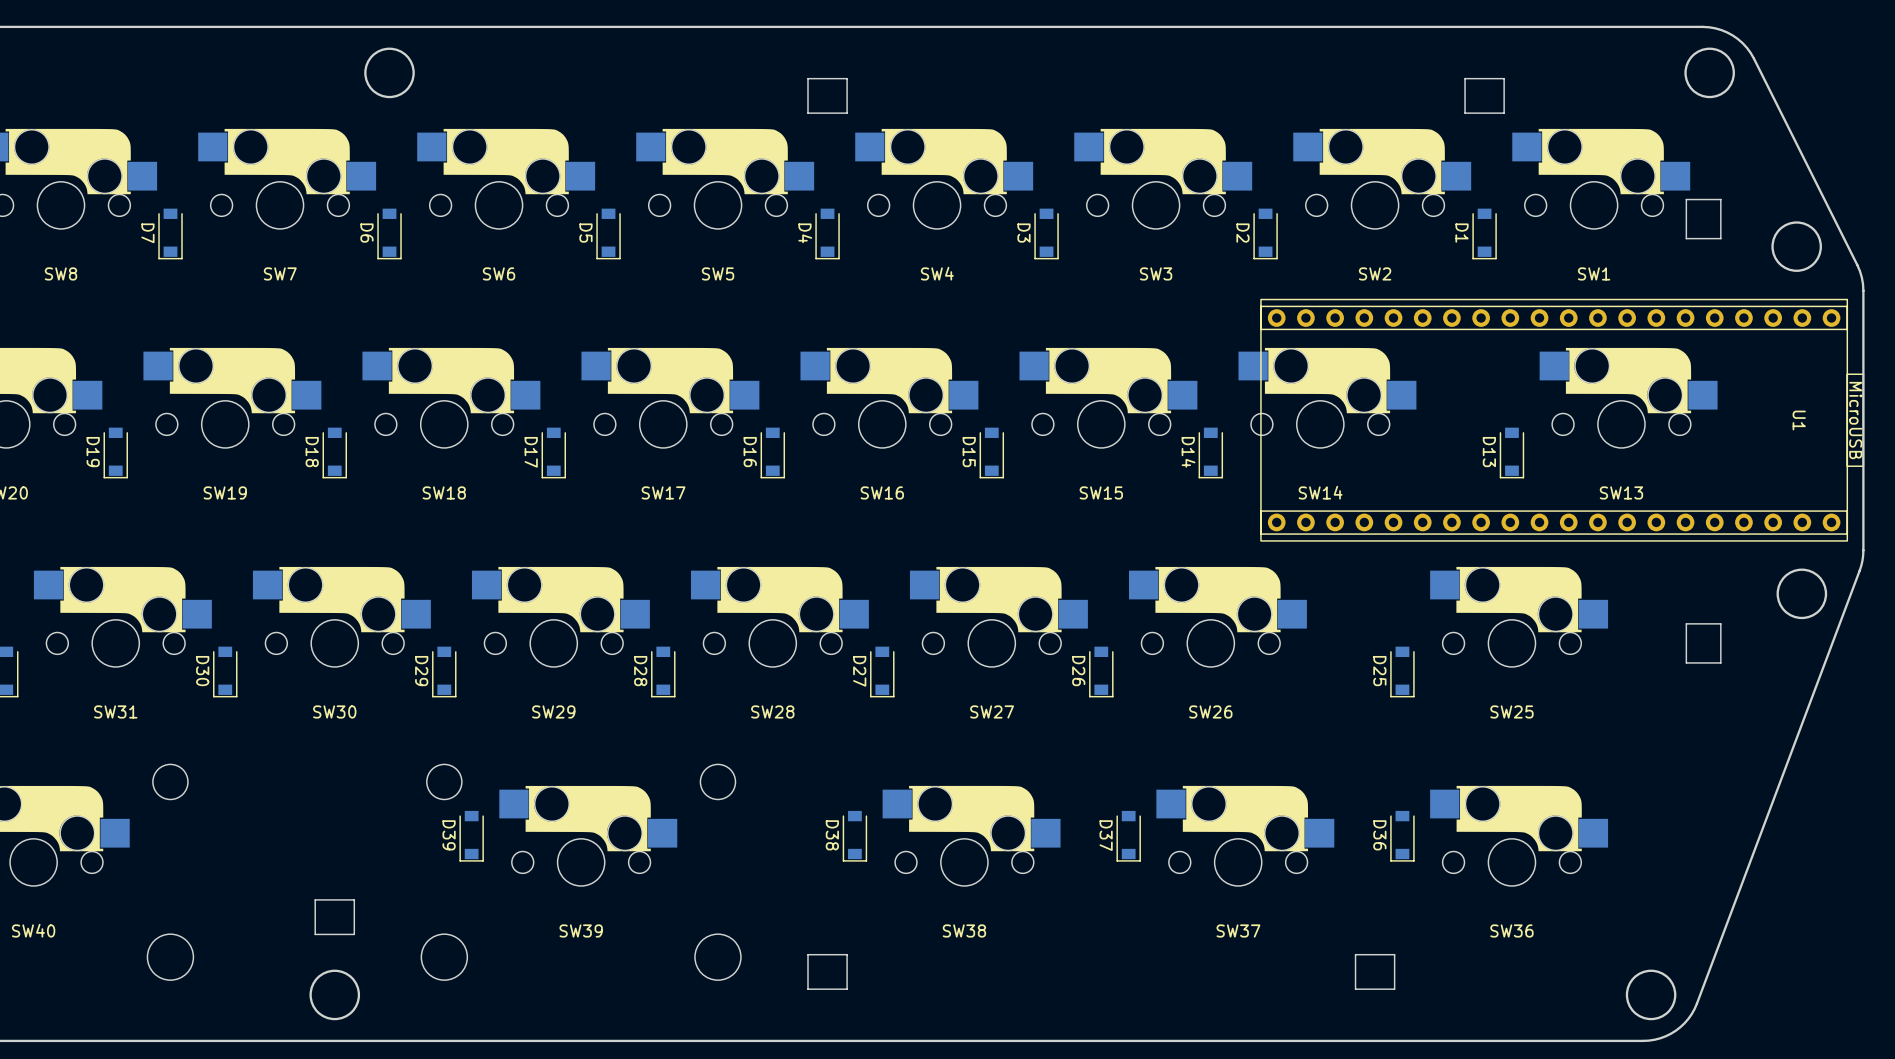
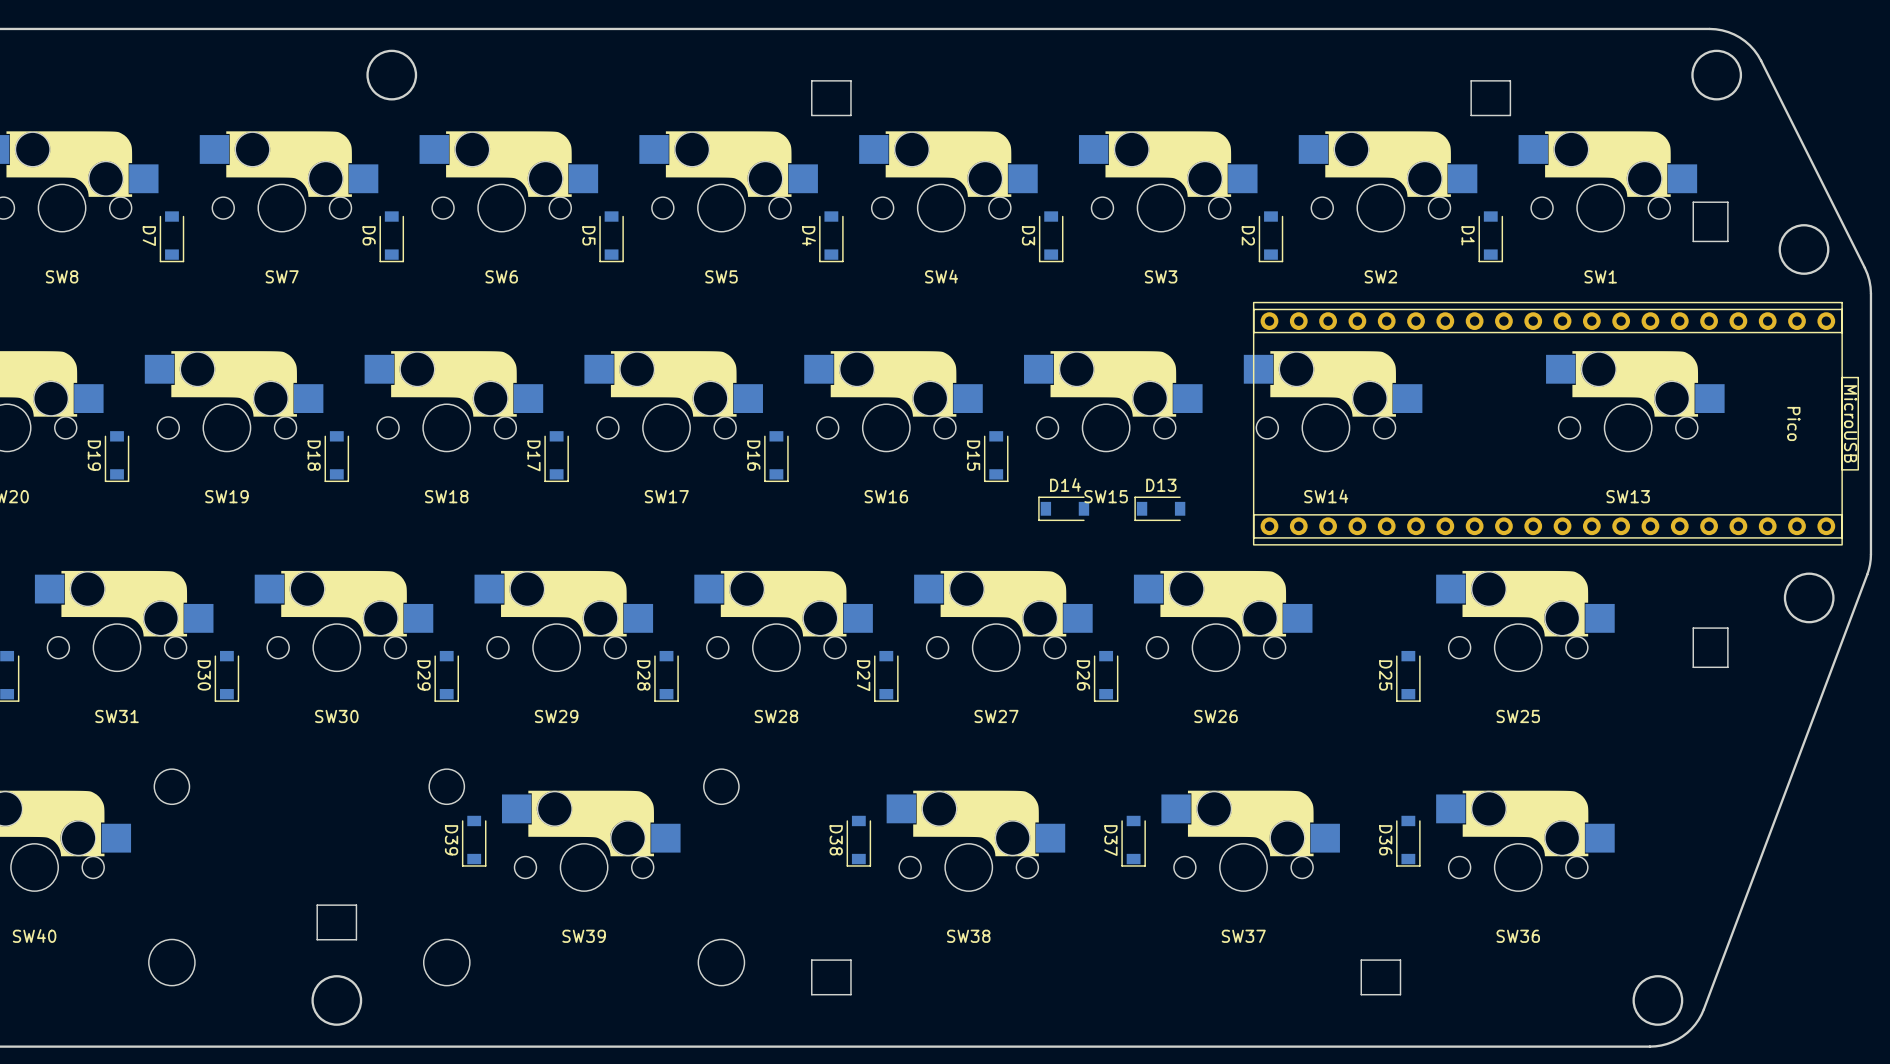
Pico: none -> (1555, 423)
U1: (1562, 420) -> none
D14 rotation: 0° (1210, 452) -> 90° clockwise (1063, 508)
D14 position: (1210, 452) -> (1063, 508)
D13 rotation: 0° (1511, 452) -> 90° clockwise (1159, 508)
D13 position: (1511, 452) -> (1159, 508)

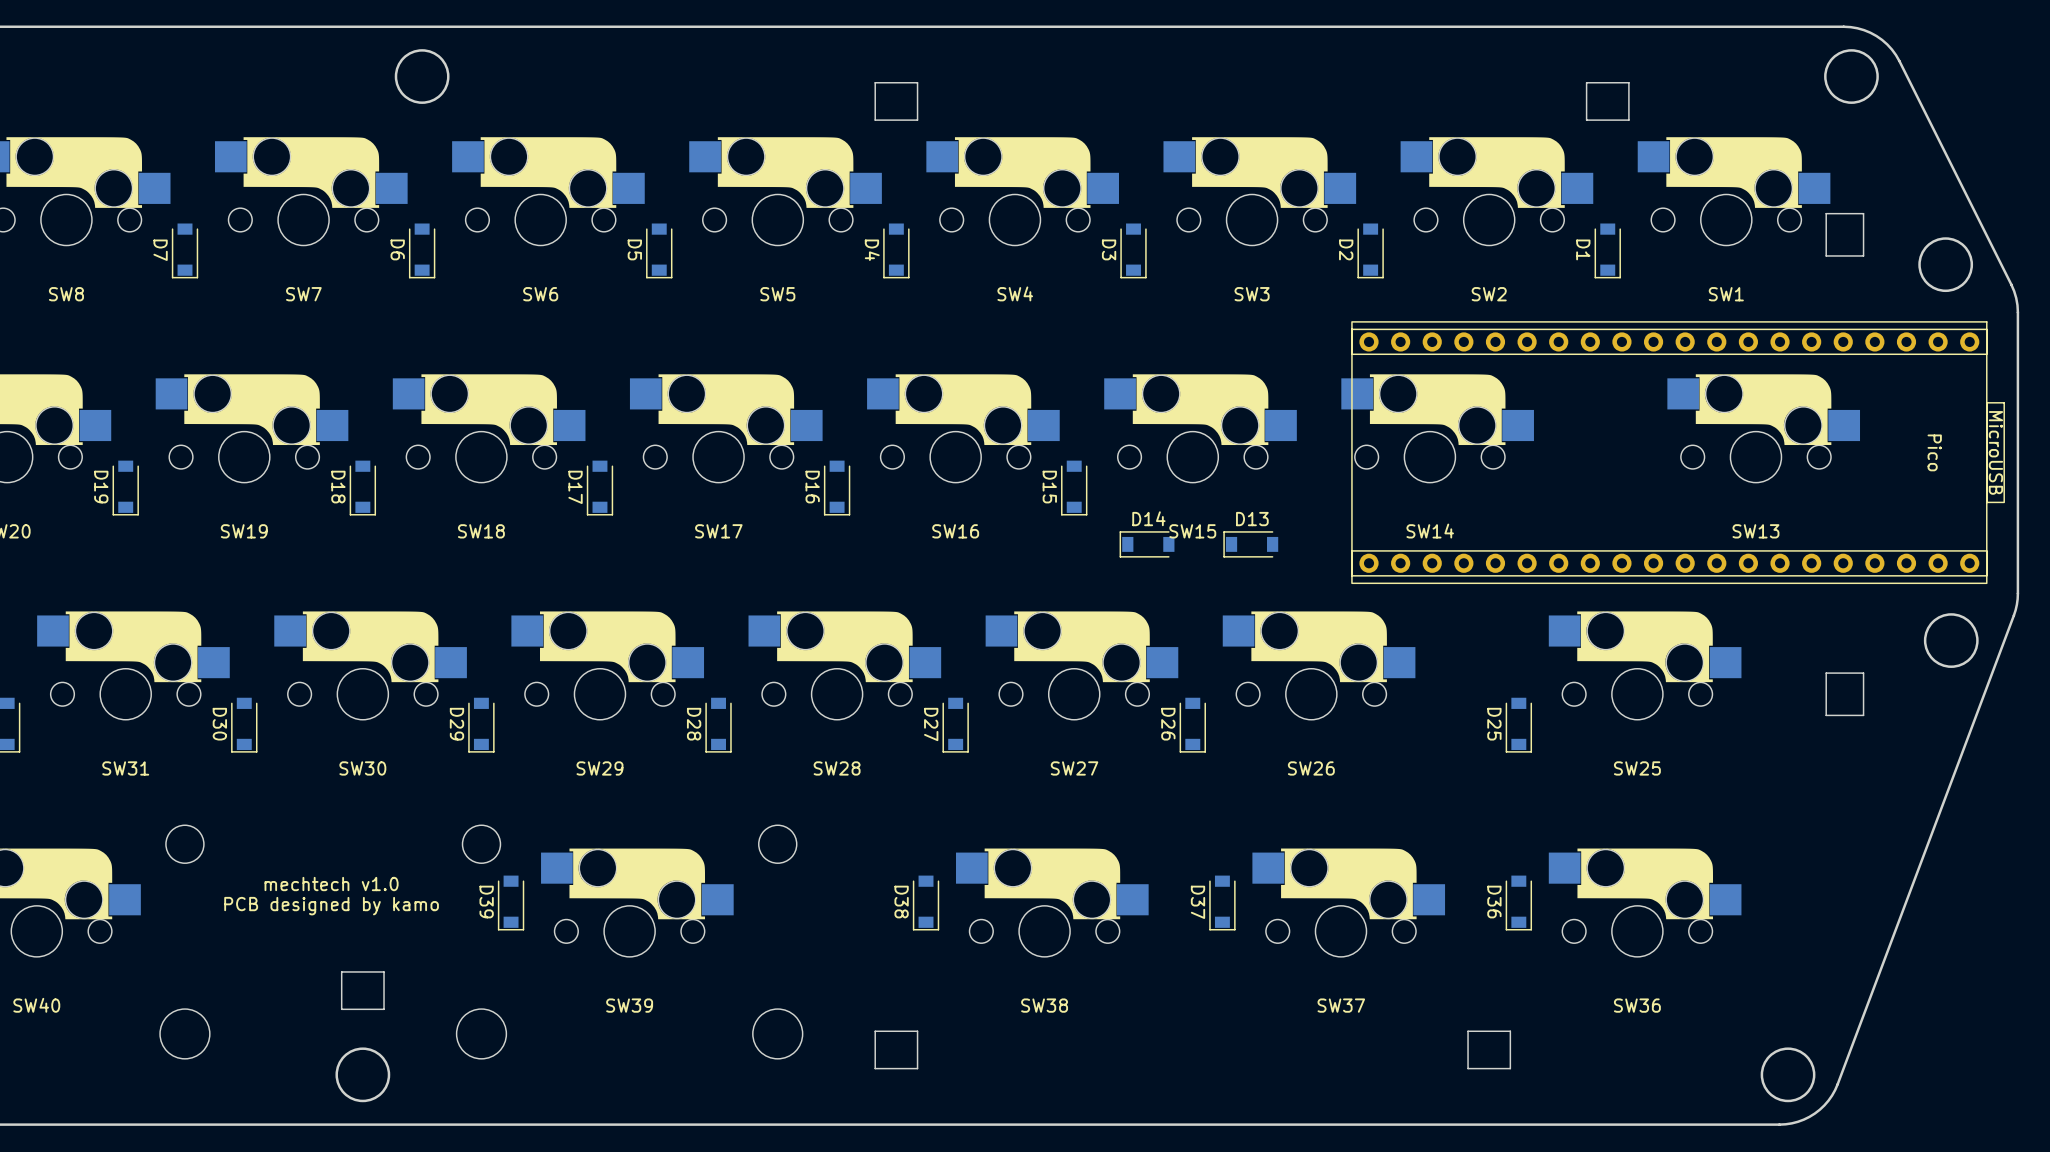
text: none -> mechtech v1.0 (331, 884)
text: none -> PCB designed by kamo (331, 906)

